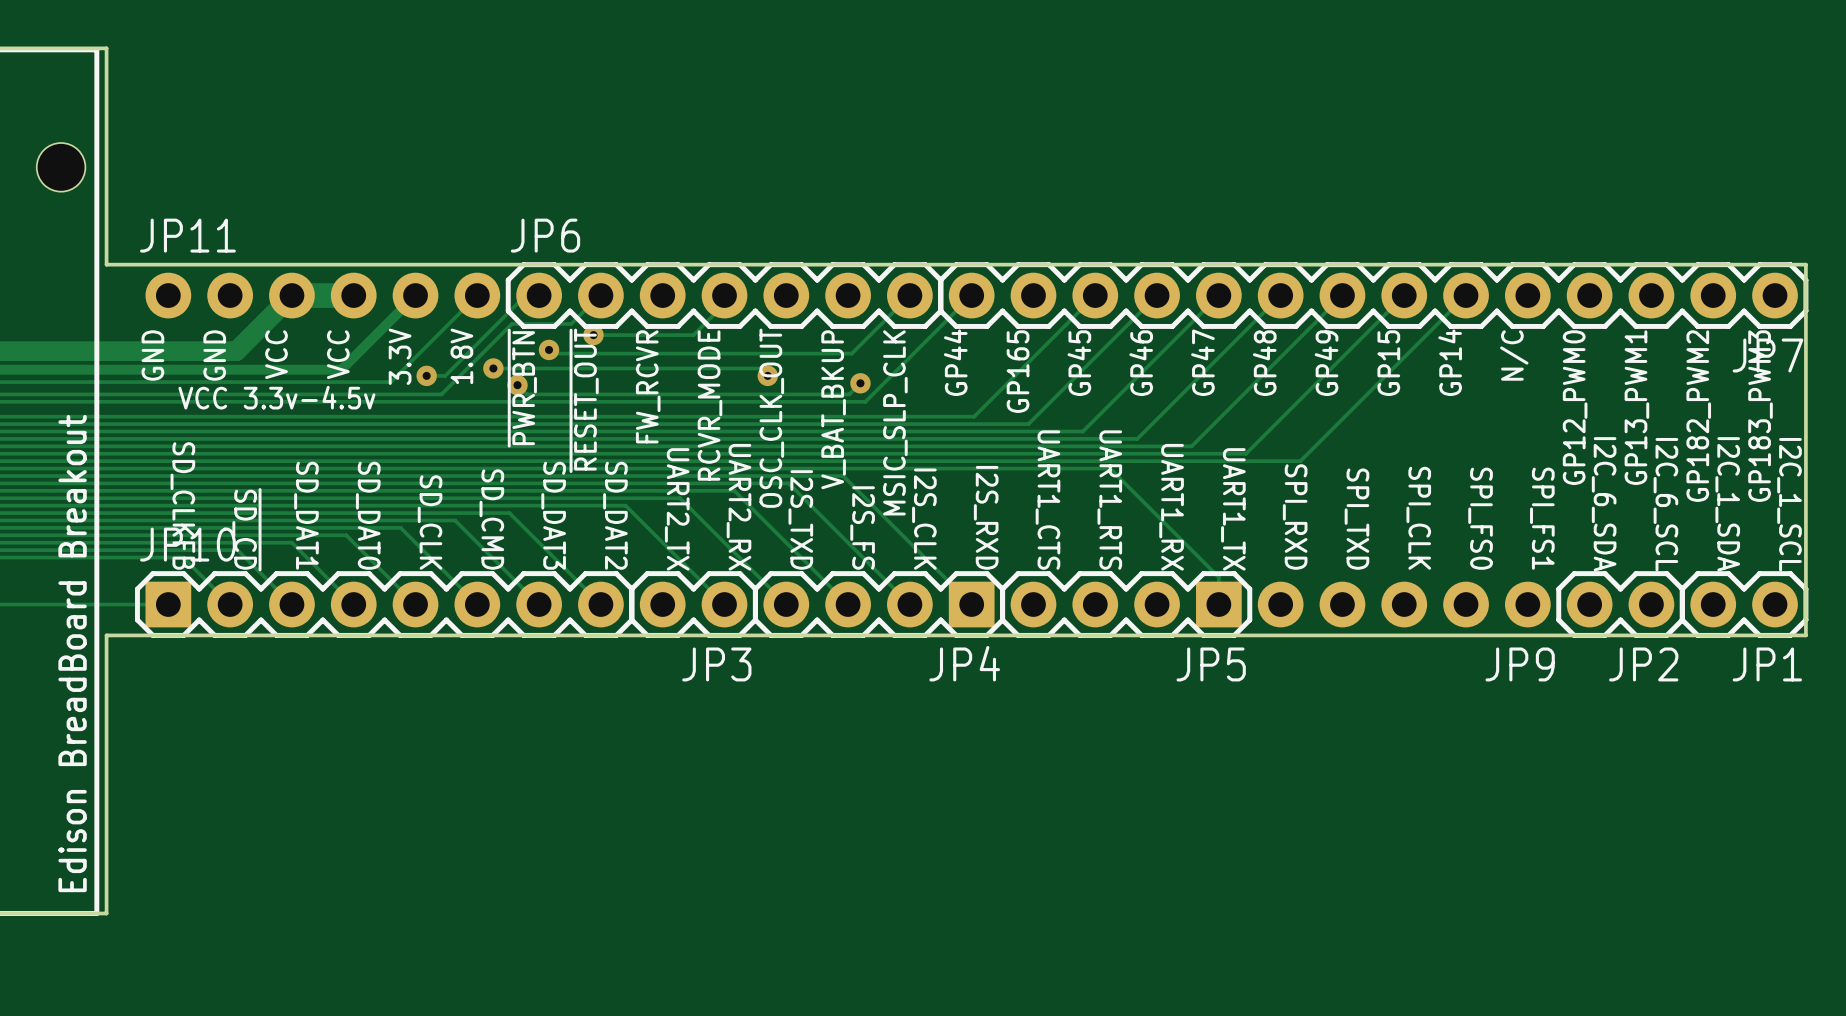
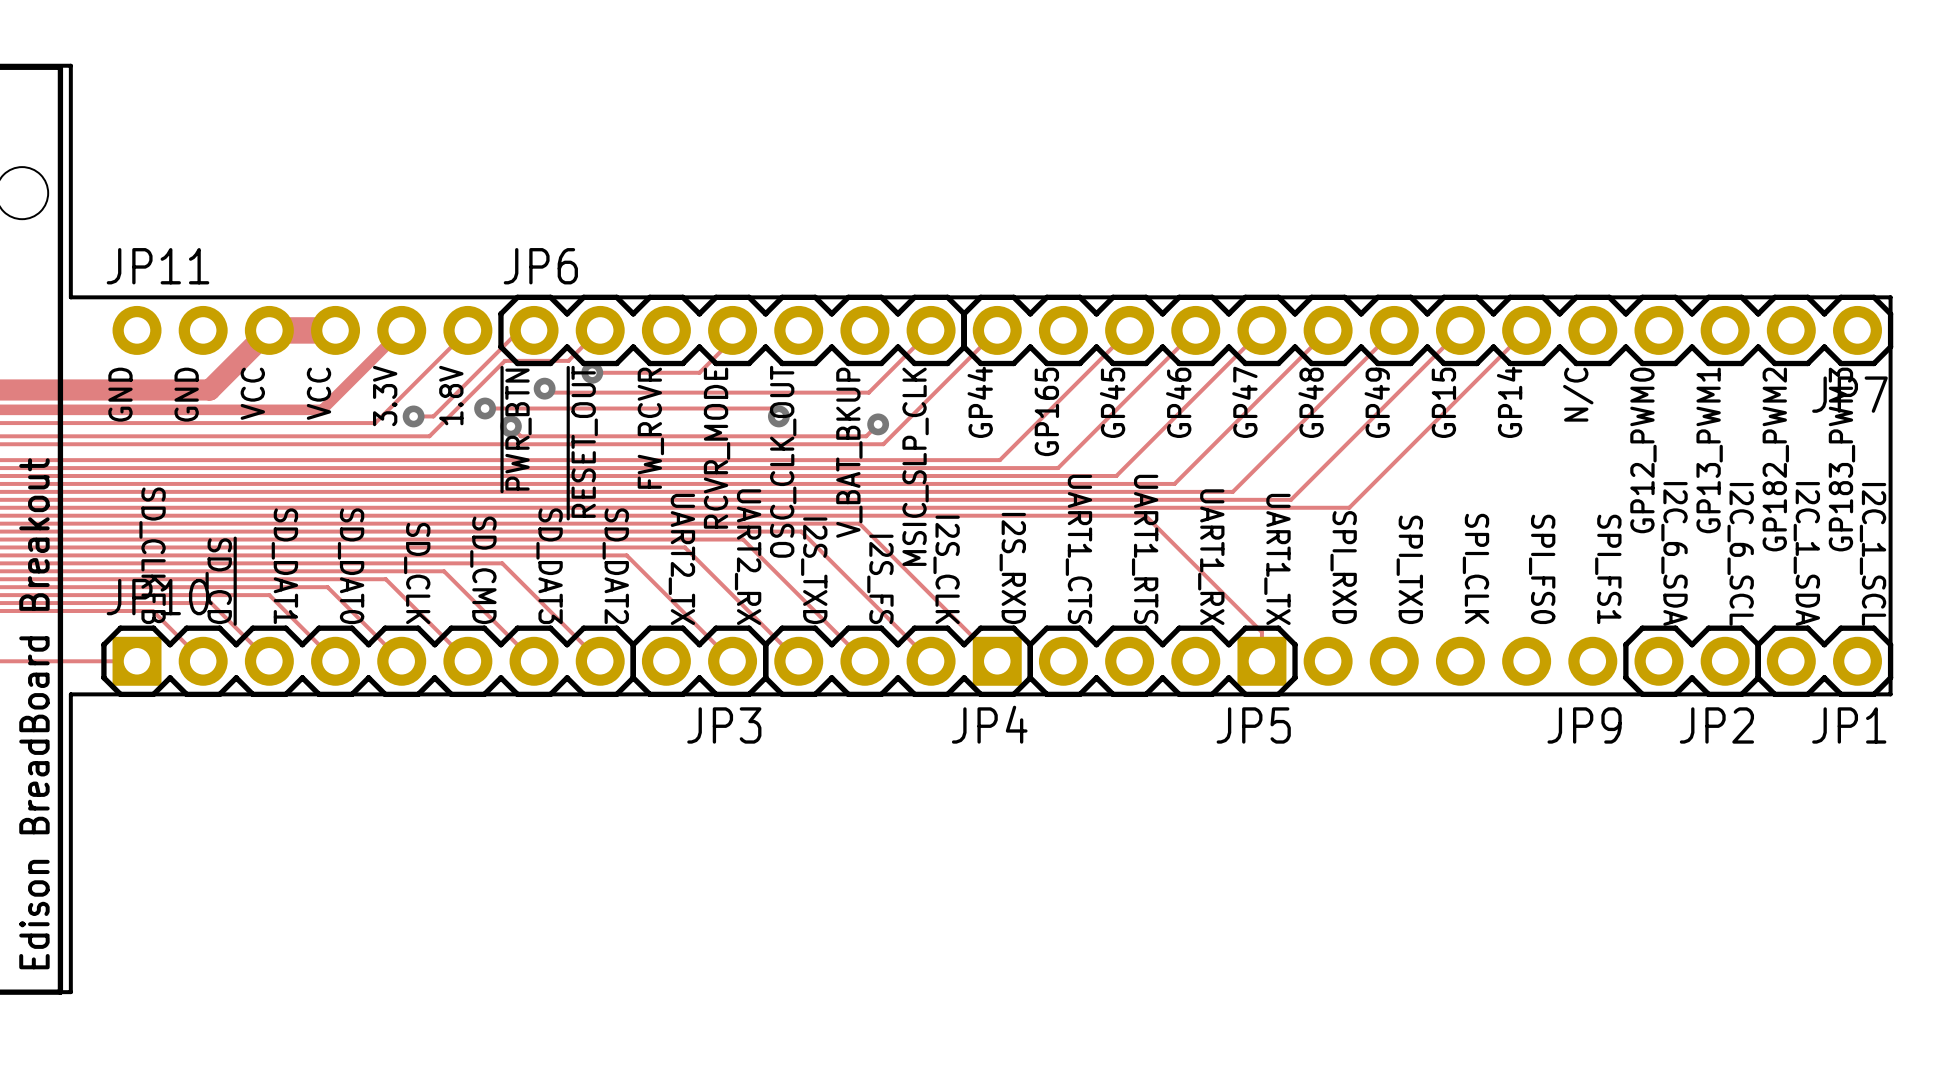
text: VCC 3.3v-4.5v (276, 397) -> none

